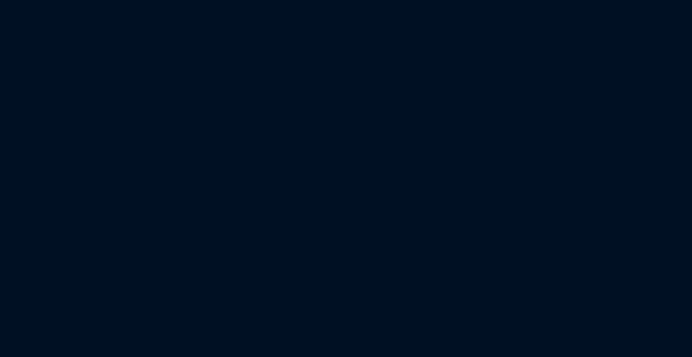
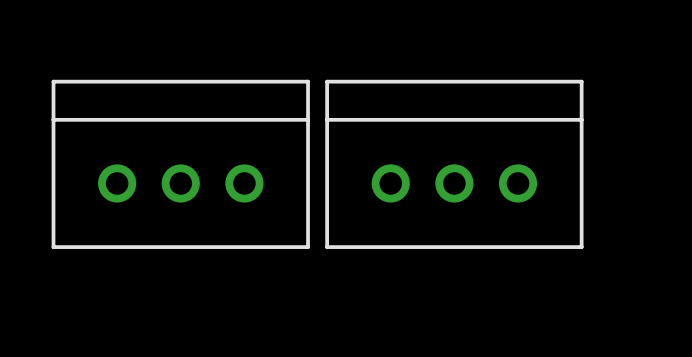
part: none -> (180, 164)
part: none -> (454, 164)

